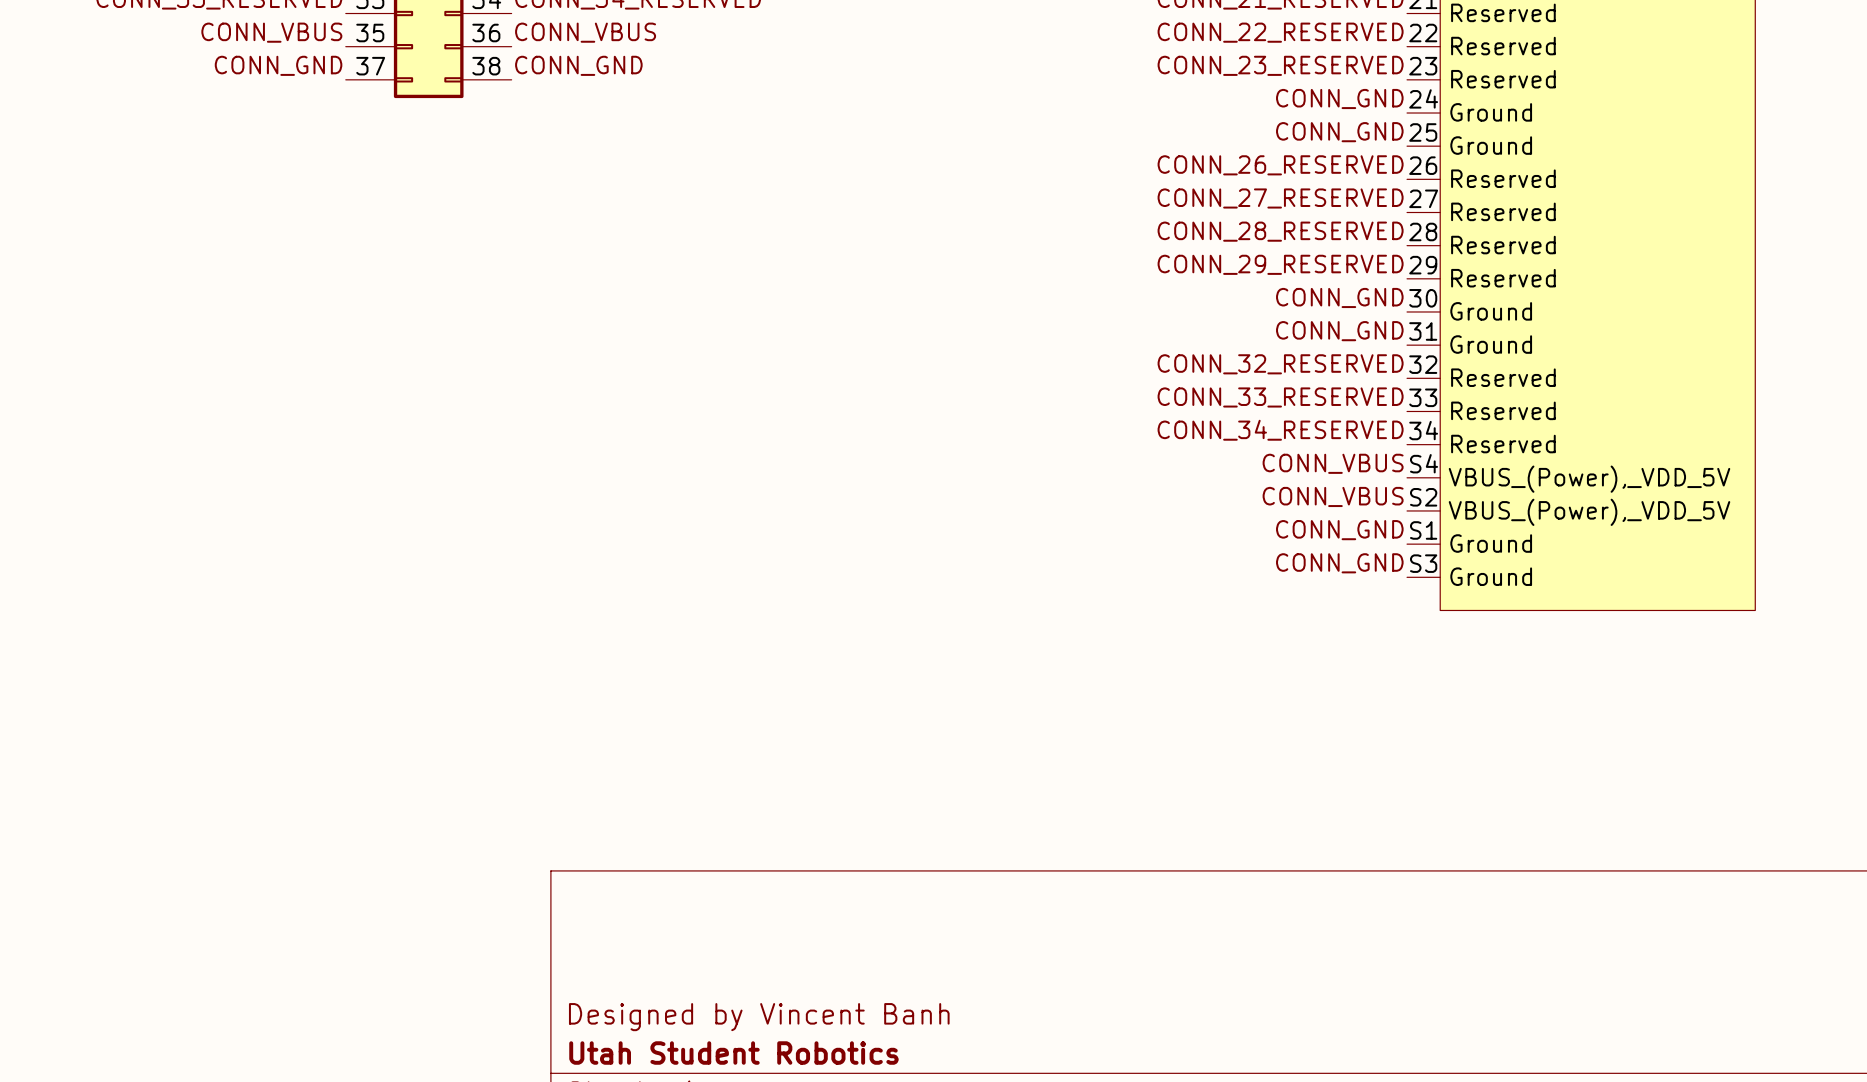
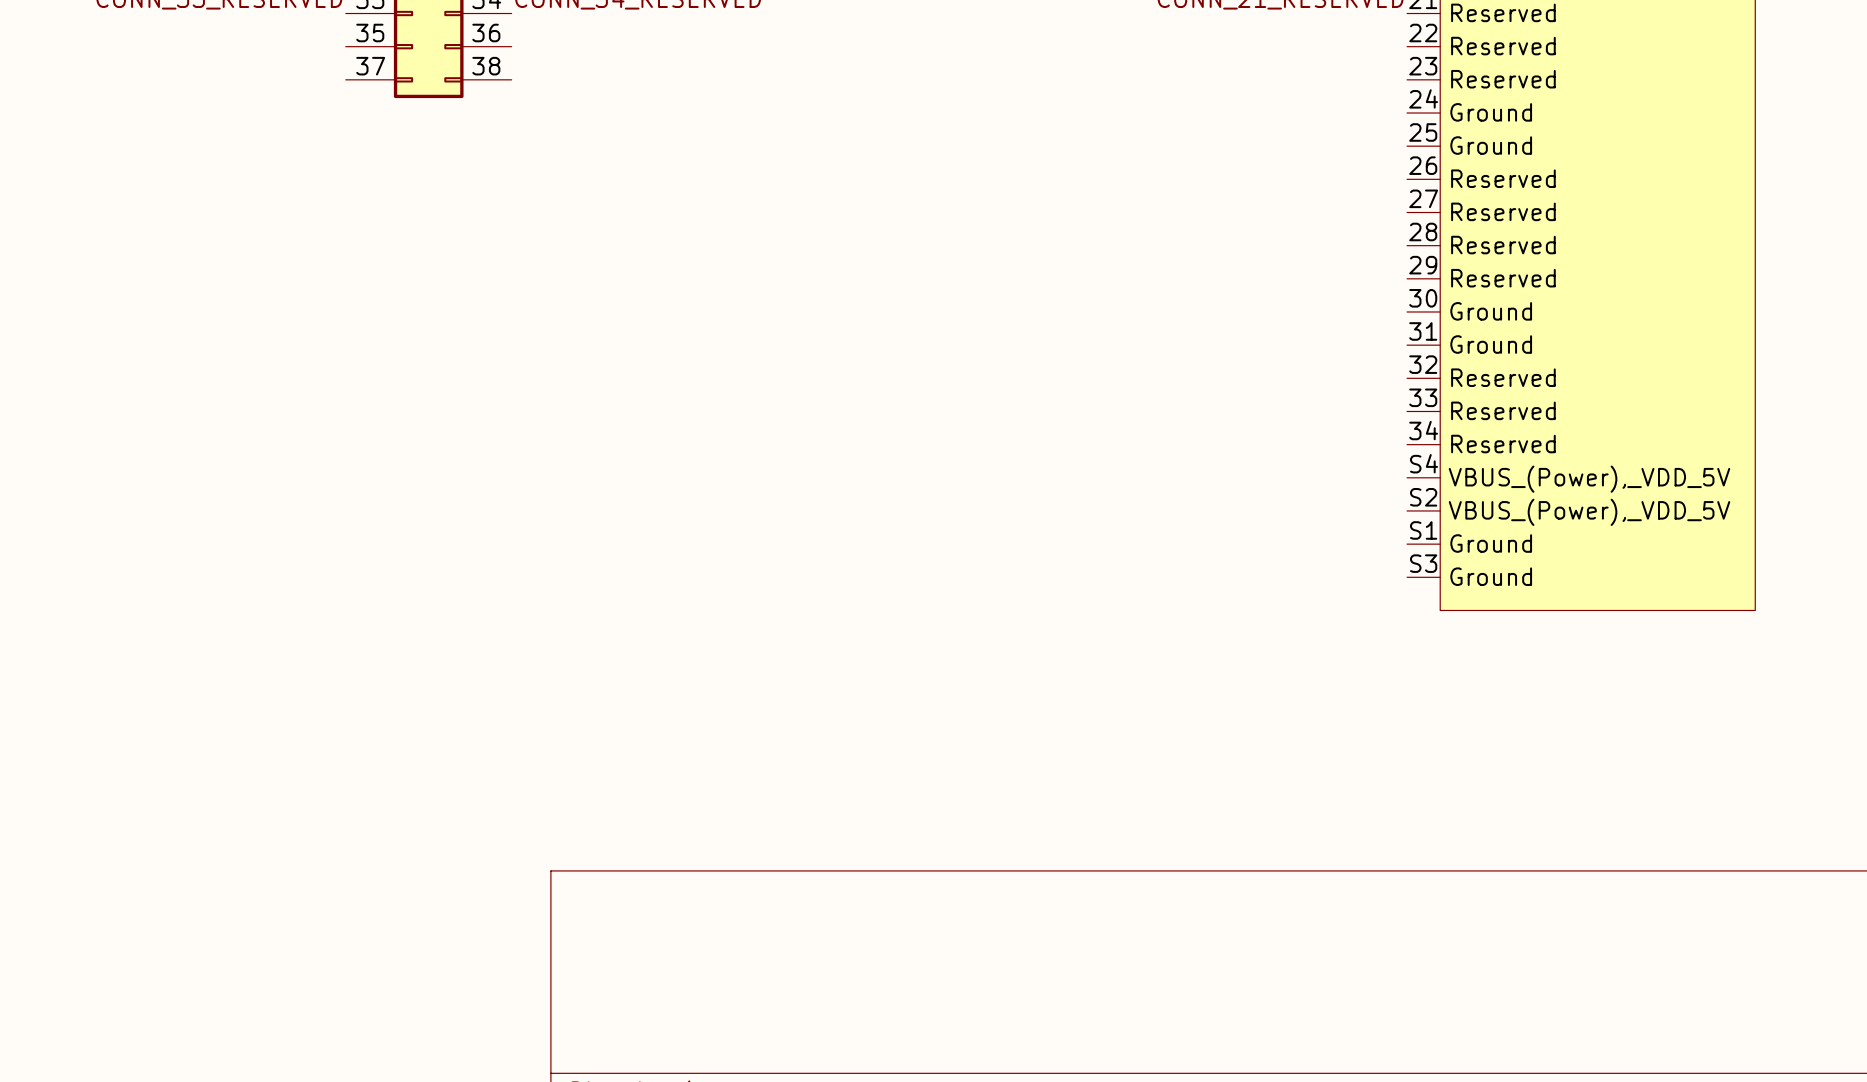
label: CONN_VBUS (271, 32) -> none
label: CONN_VBUS (585, 32) -> none
label: CONN_22_RESERVED (1280, 32) -> none
label: CONN_GND (278, 65) -> none
label: CONN_GND (578, 65) -> none
label: CONN_23_RESERVED (1280, 65) -> none
label: CONN_GND (1339, 98) -> none
label: CONN_GND (1339, 132) -> none
label: CONN_26_RESERVED (1280, 165) -> none
label: CONN_27_RESERVED (1280, 198) -> none
label: CONN_28_RESERVED (1280, 231) -> none
label: CONN_29_RESERVED (1280, 264) -> none
label: CONN_GND (1339, 297) -> none
label: CONN_GND (1339, 331) -> none
label: CONN_32_RESERVED (1280, 364) -> none
label: CONN_33_RESERVED (1280, 397) -> none
label: CONN_34_RESERVED (1280, 430) -> none
label: CONN_VBUS (1333, 463) -> none
label: CONN_VBUS (1333, 496) -> none
label: CONN_GND (1339, 530) -> none
label: CONN_GND (1339, 563) -> none
title block: Designed by Vincent Banh (759, 1017) -> none
title block: Utah Student Robotics (733, 1053) -> none

